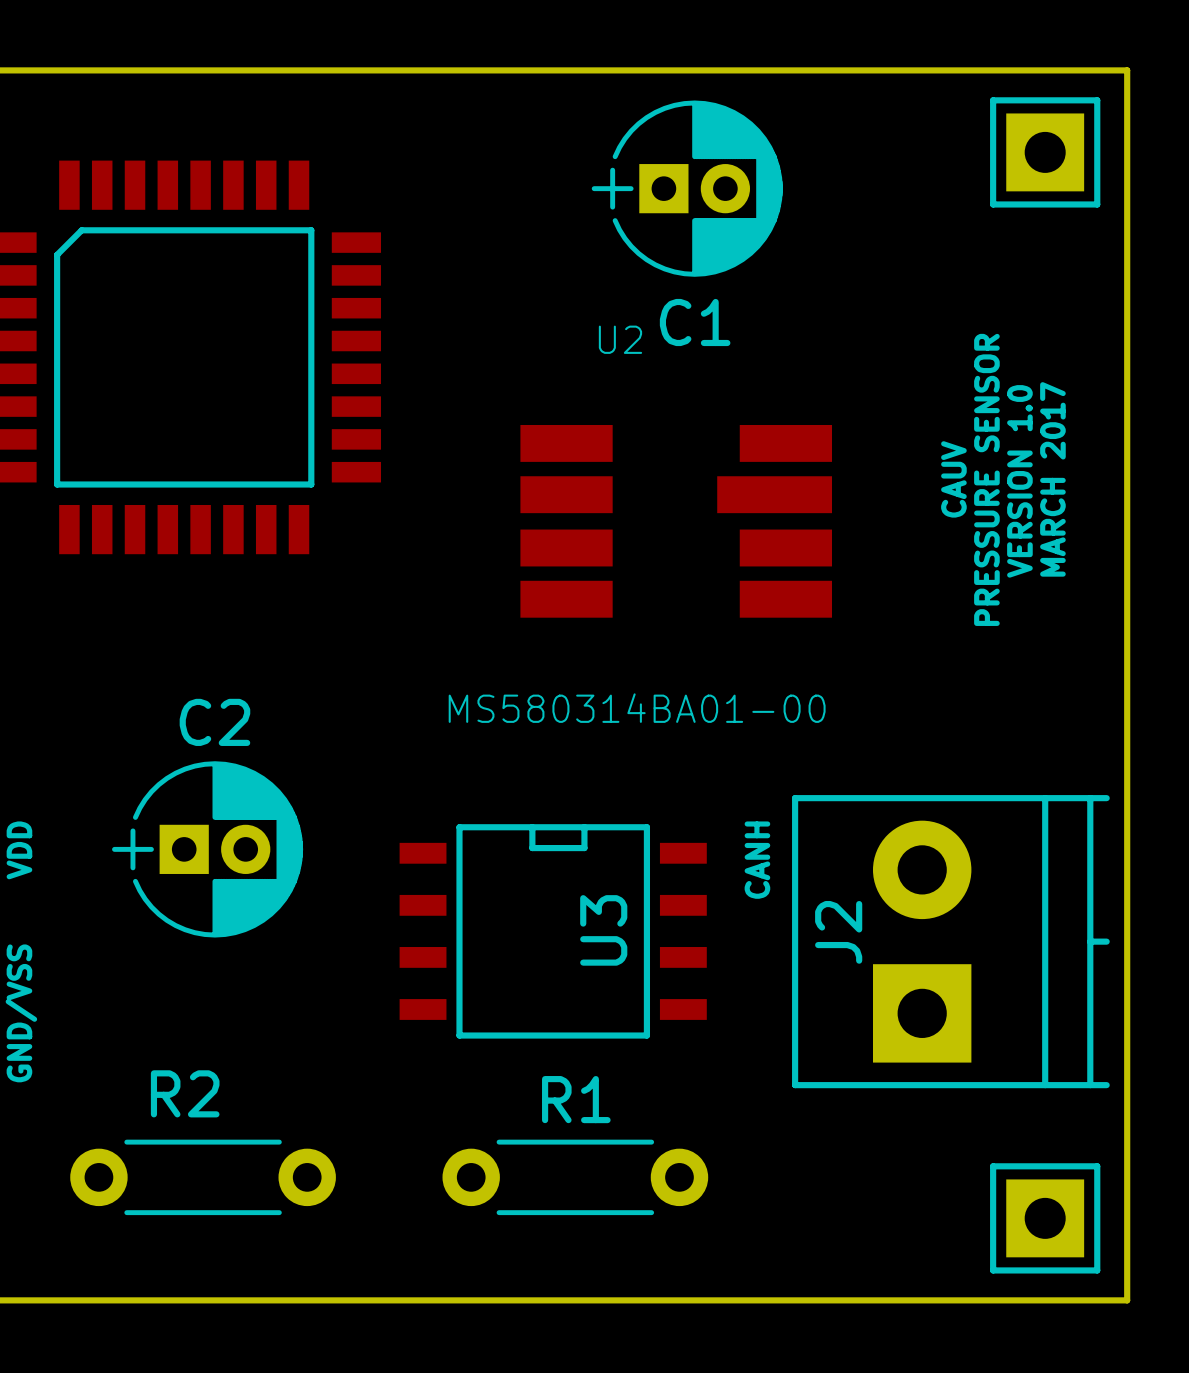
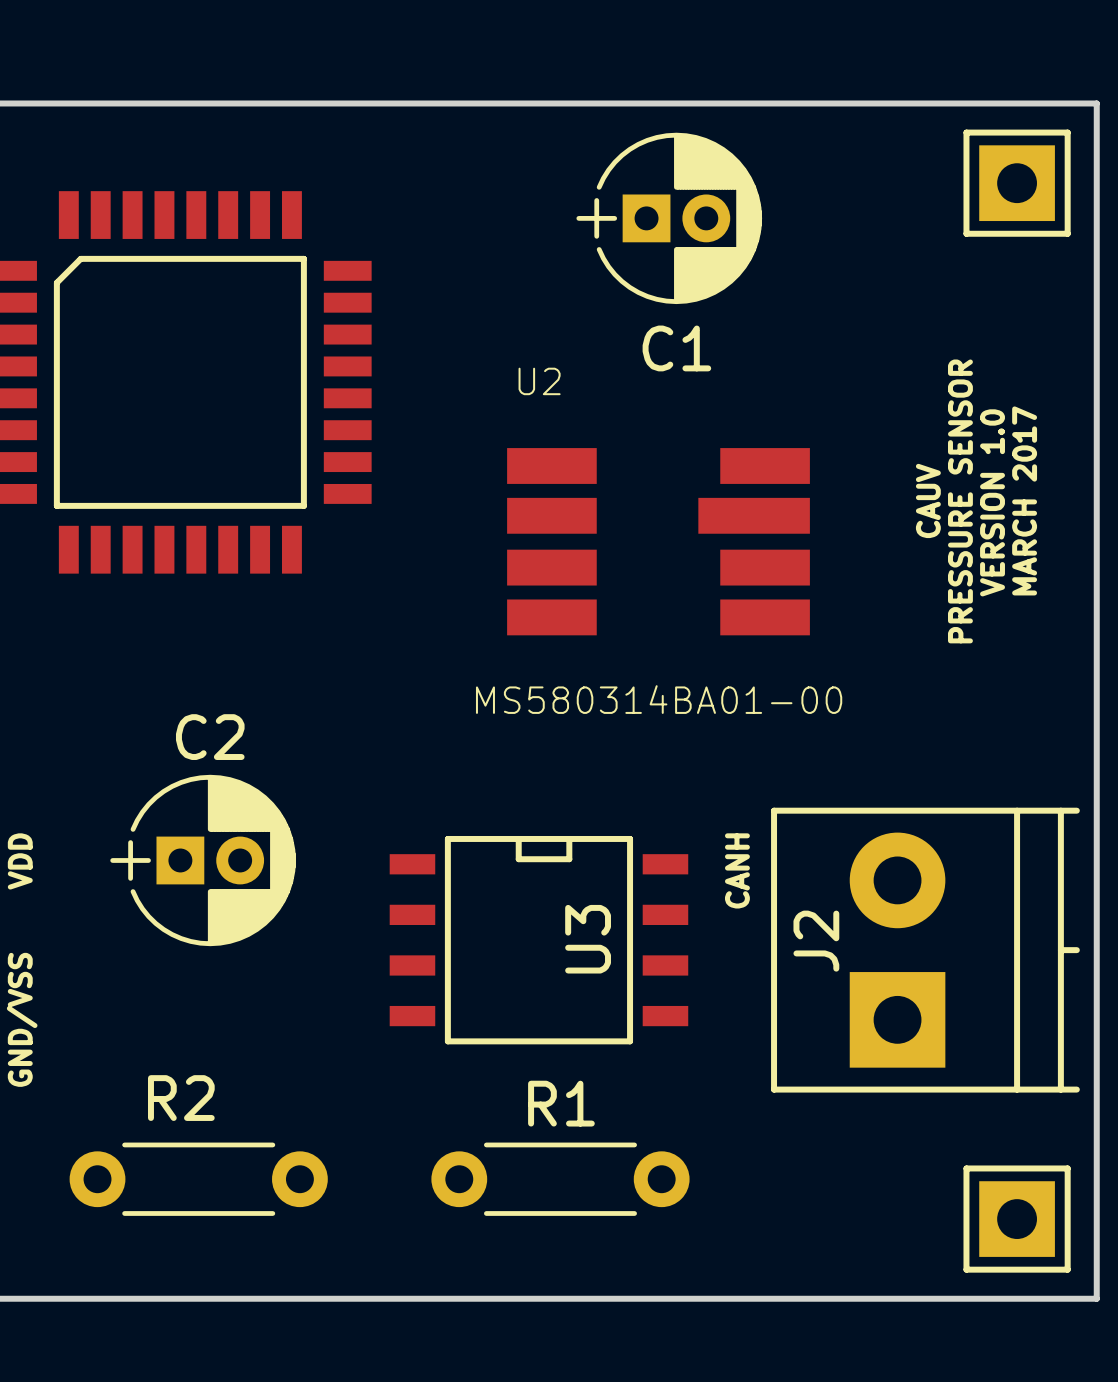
U2 name position: U2 (620, 339) -> U2 (539, 381)
U2 value position: MS580314BA01-00 (637, 708) -> MS580314BA01-00 (659, 699)

